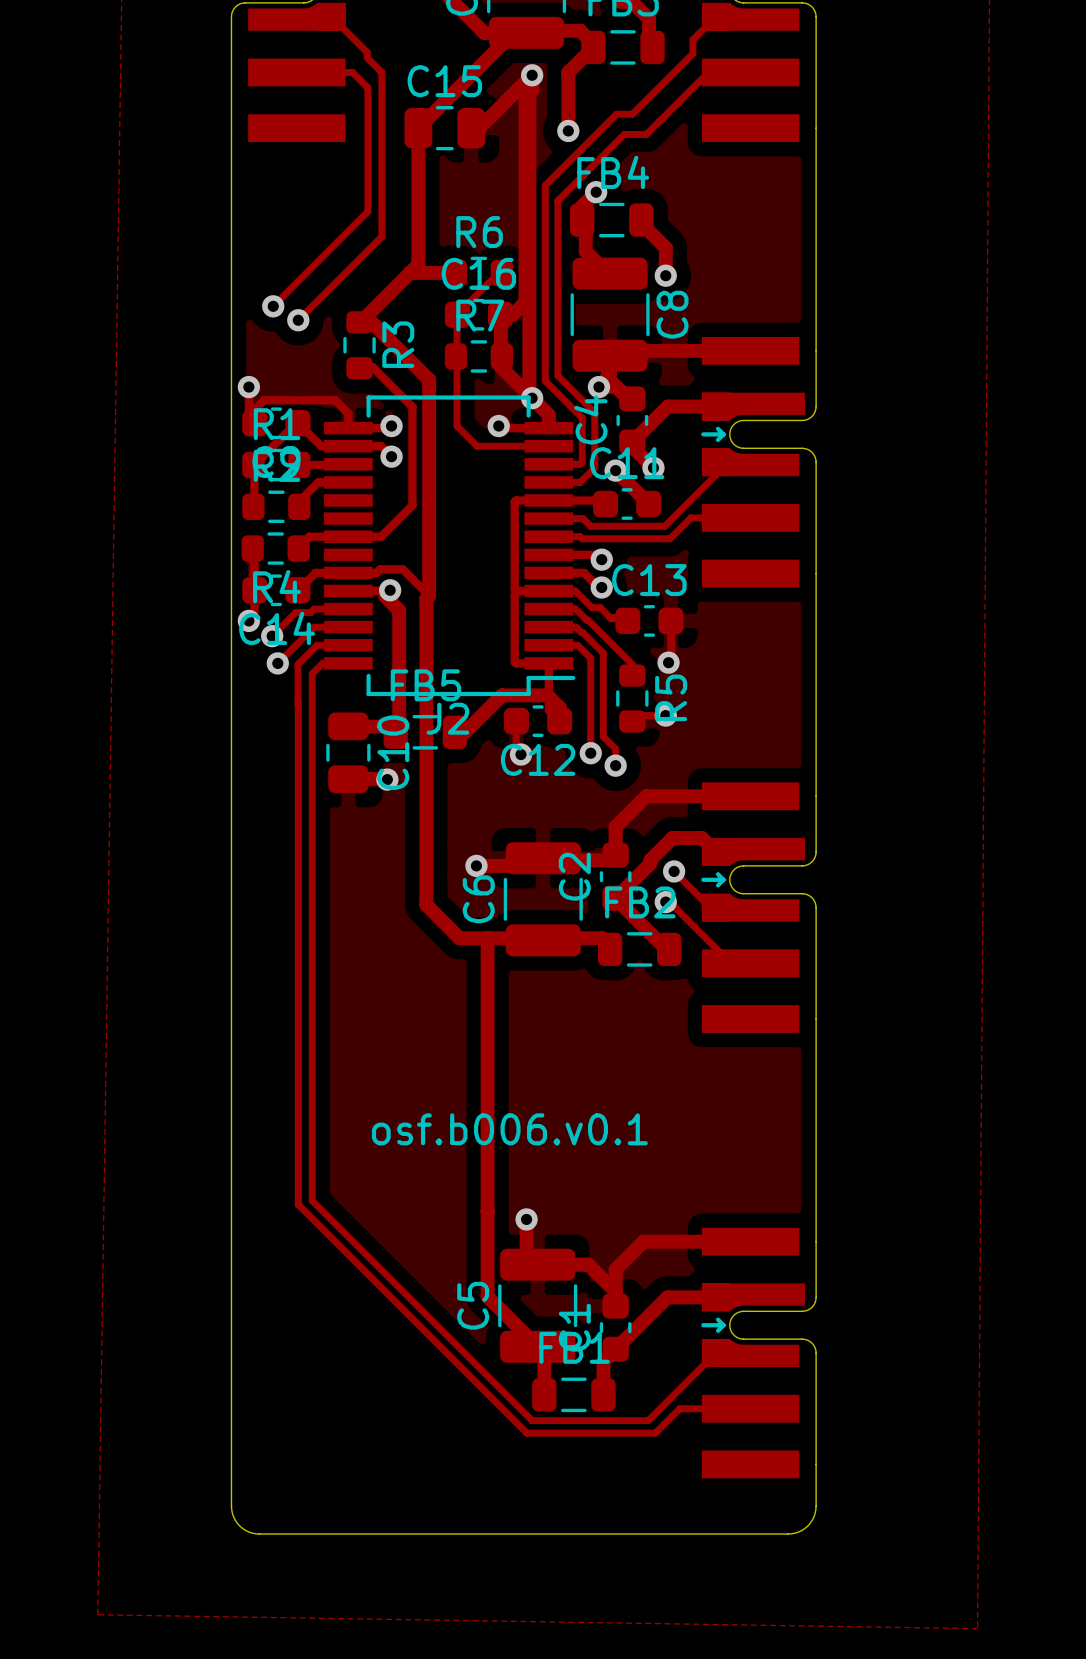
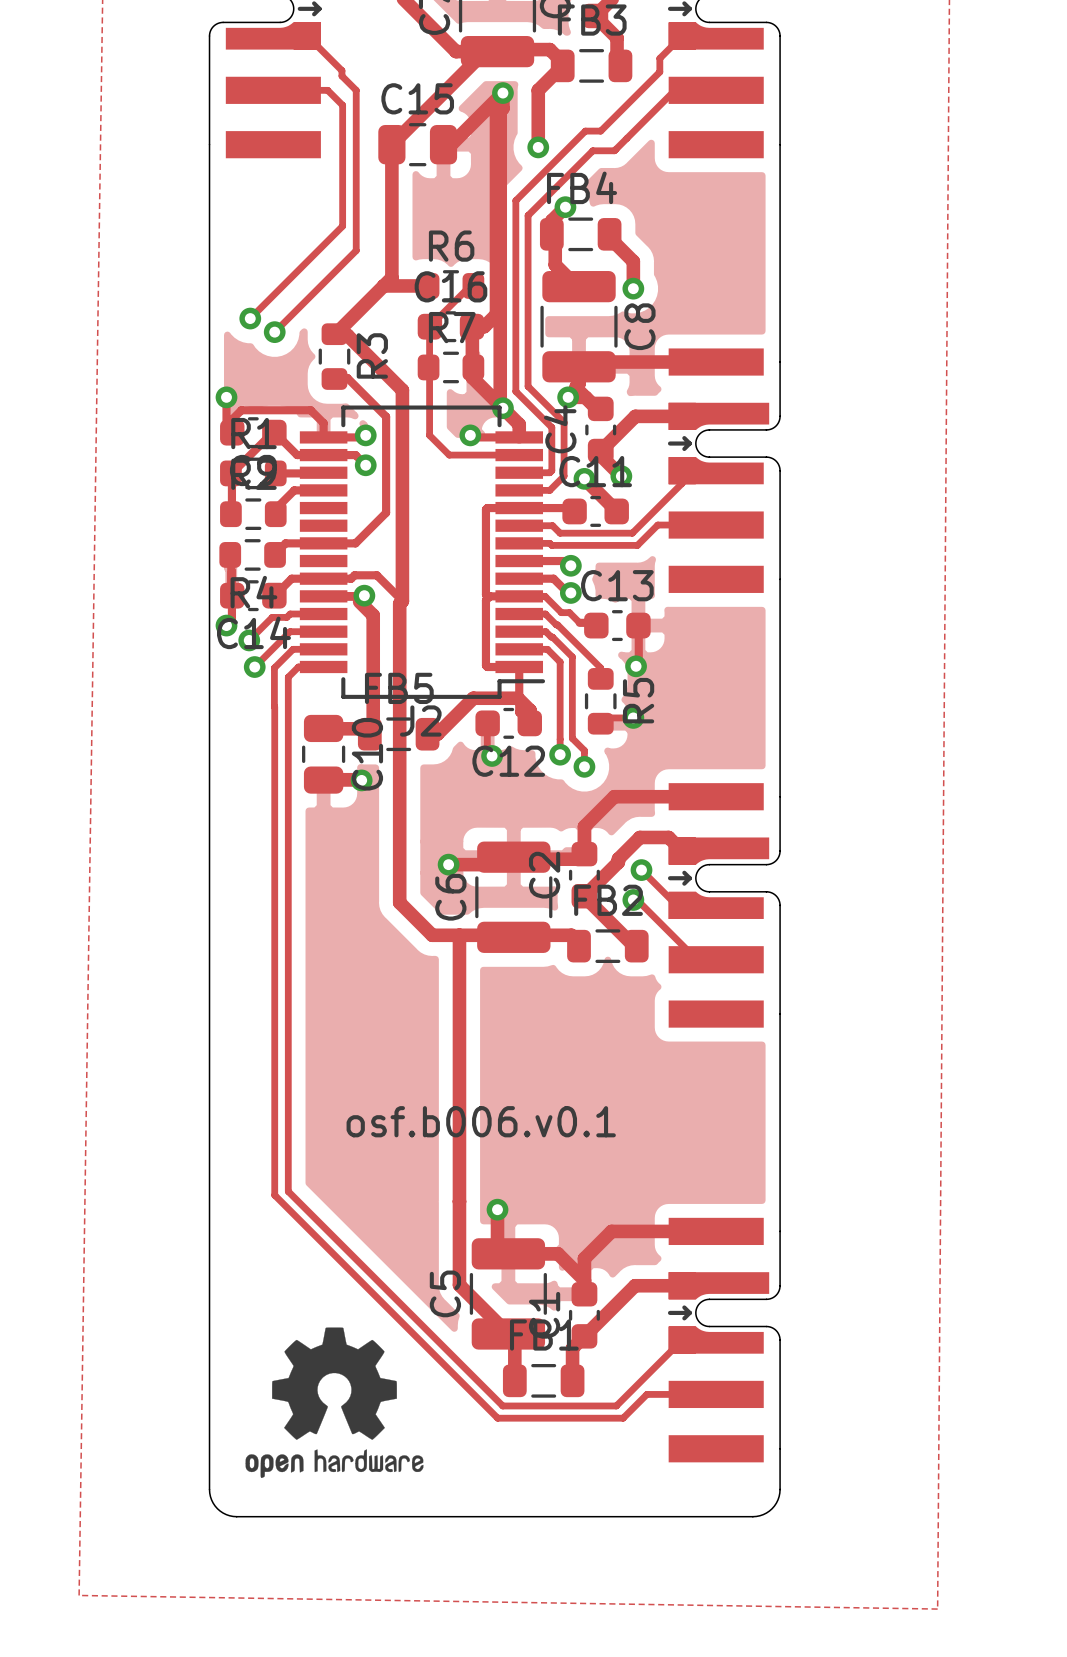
drawing: none -> [245, 1327, 424, 1479]

